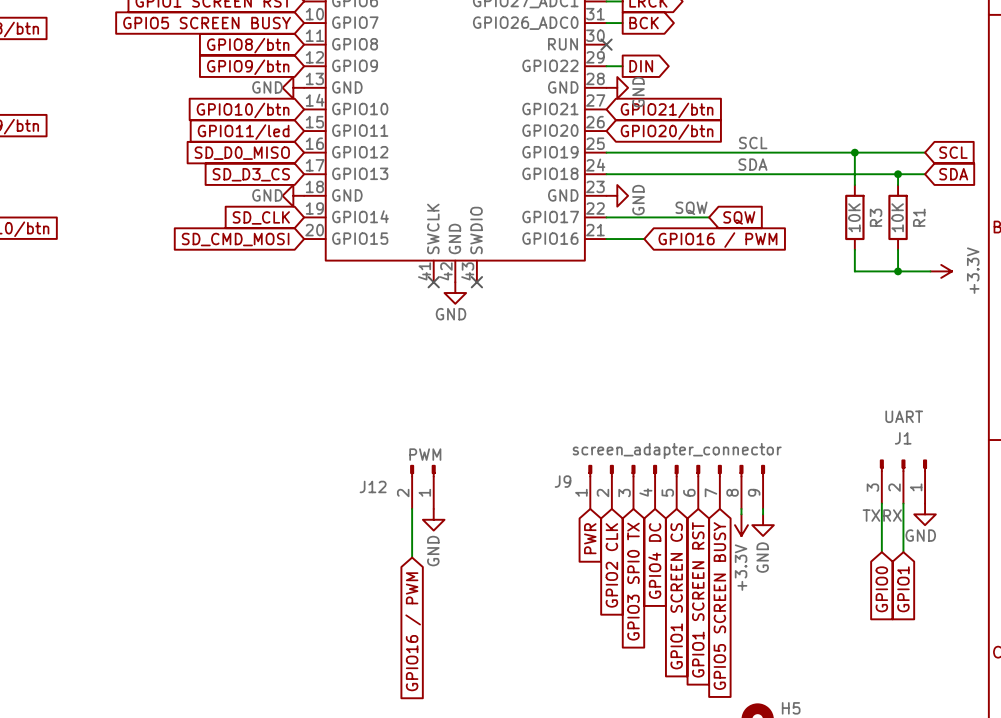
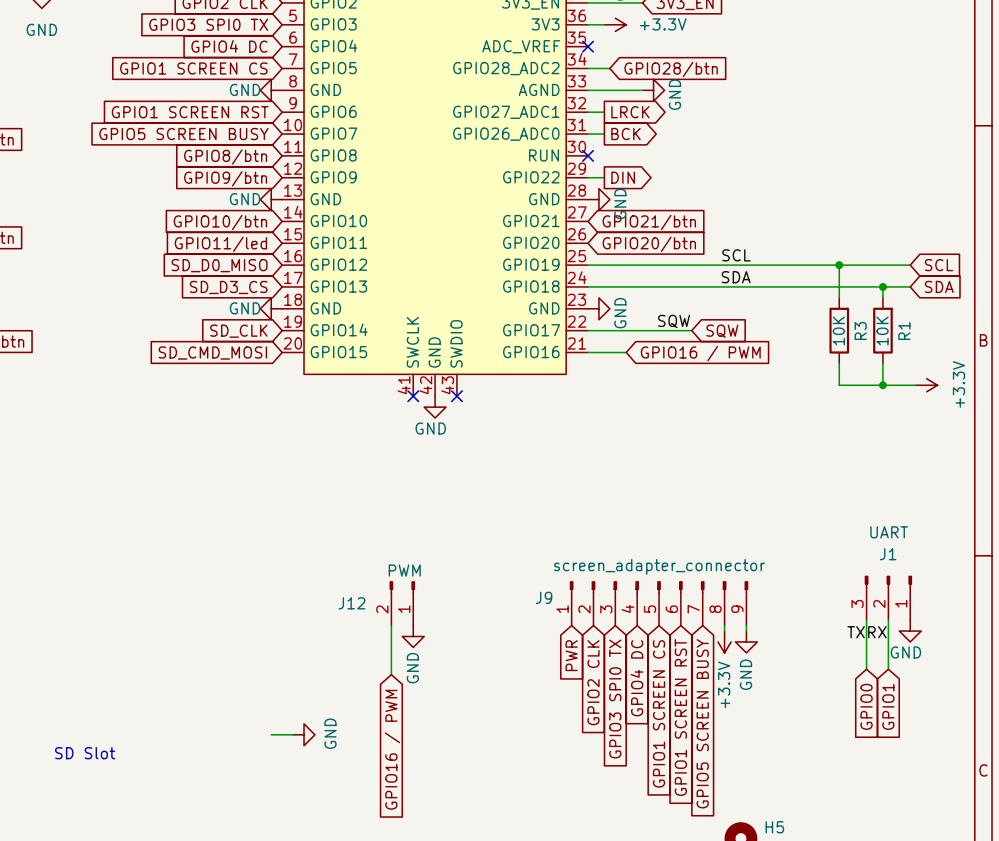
wire: none -> (271, 734) (293, 734)
power symbol: none -> GND (304, 734)
text: none -> SD Slot (85, 753)

